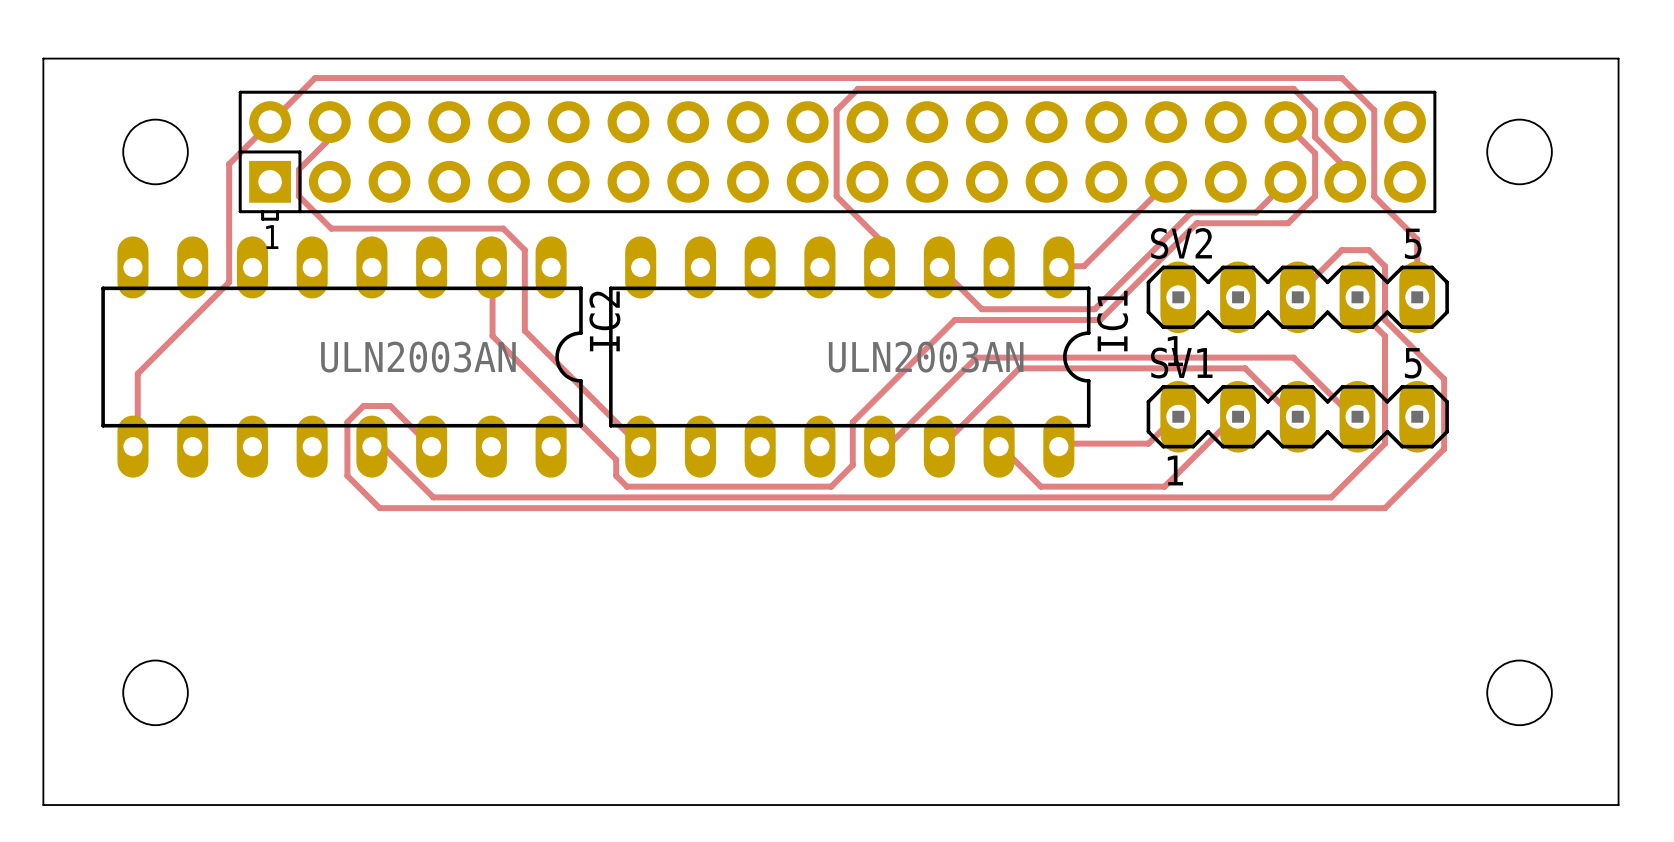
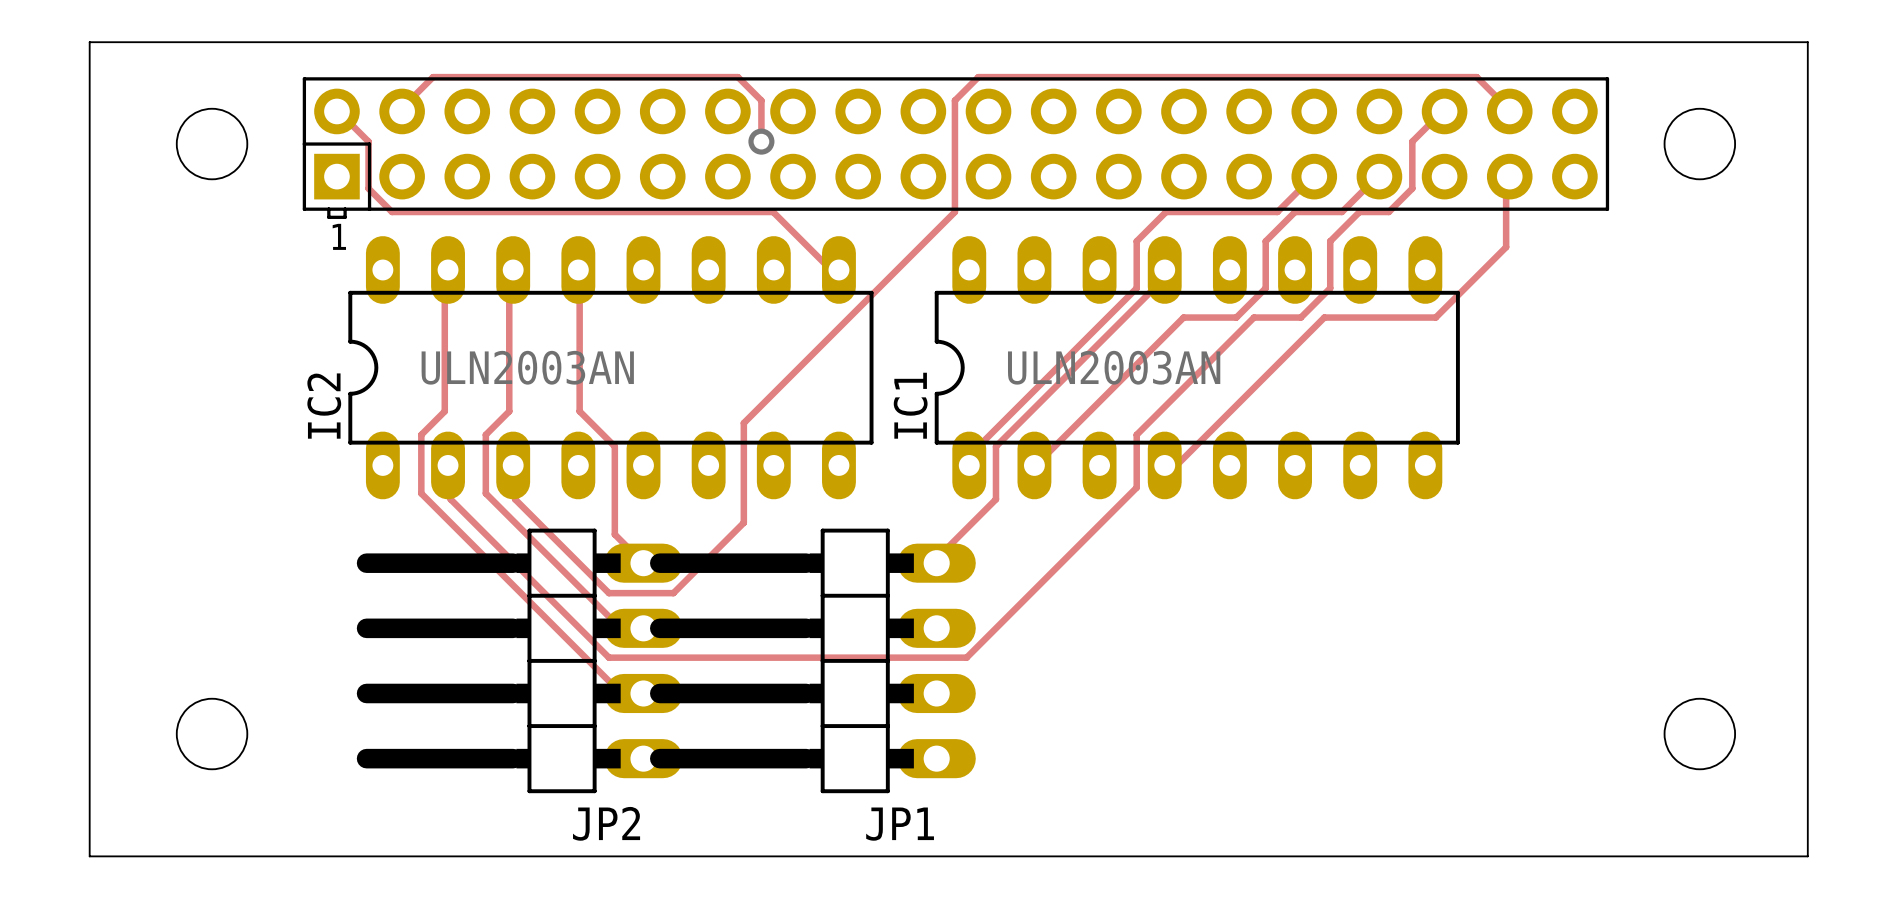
track: (836, 112) (858, 88) (1293, 88) (1315, 110) (1315, 137) (1341, 164) (1341, 180) (1345, 181) -> (954, 100) (978, 77) (1476, 77) (1509, 111)
track: (329, 122) (325, 126) (325, 142) (299, 169) -> (336, 111) (368, 141) (368, 163)
track: none -> (402, 111) (403, 106) (433, 77) (737, 77) (761, 100) (761, 141)
track: (1285, 122) (1315, 153) (1315, 196) (1288, 223) (1196, 223) (1100, 319) (954, 319) (852, 422) (852, 434) -> (1314, 176) (1277, 211) (1166, 211) (1136, 241) (1136, 288) (972, 452)
via: none -> (761, 141)
track: (1166, 181) (1164, 185) (1083, 266) (1058, 267) -> none
track: none -> (1379, 176) (1341, 211) (1295, 211) (1265, 241) (1265, 288) (1236, 317) (1183, 317) (1034, 465)
track: (1285, 181) (1255, 212) (1191, 212) (1094, 309) (981, 309) (939, 267) -> none
track: none -> (1509, 176) (1506, 176) (1506, 247) (1435, 317) (1324, 317) (1177, 464) (1164, 465)
track: (299, 192) (299, 196) (331, 228) (503, 228) (524, 250) (524, 330) (640, 446) -> (368, 188) (392, 211) (773, 211) (825, 264) (837, 264) (838, 269)
track: (836, 196) (879, 239) (879, 267) -> (954, 192) (954, 211) (743, 423) (743, 522) (673, 593) (608, 593) (515, 499) (515, 470) (513, 465)
track: none -> (513, 269) (509, 270) (509, 411) (485, 434) (485, 493) (620, 628) (643, 628)
track: none -> (1164, 269) (1160, 270) (1160, 282) (995, 446) (995, 499) (937, 557) (936, 563)
track: (1297, 297) (1298, 293) (1341, 250) (1368, 250) (1384, 266) (1384, 319) (1444, 379) (1444, 449) (1384, 508) (379, 508) (347, 475) (347, 472) -> (643, 693) (620, 692) (421, 493)
SV2: (1297, 297) -> none
track: (1357, 297) (1358, 309) (1384, 336) (1384, 443) (1331, 497) (433, 497) (385, 449) (374, 449) (371, 446) -> (1444, 111) (1412, 141) (1412, 188) (1388, 211) (1359, 211) (1330, 241) (1330, 288) (1300, 317) (1253, 317) (1136, 434) (1136, 487) (966, 657) (608, 657) (450, 499) (450, 470) (448, 465)
track: (1417, 297) (1417, 239) (1374, 196) (1374, 110) (1341, 78) (315, 78) (229, 164) (229, 282) (137, 373) (137, 443) (132, 446) -> none
track: (492, 336) (616, 459) (616, 475) (626, 486) (831, 486) (852, 465) (852, 445) -> (579, 344) (579, 411) (614, 446) (614, 534) (643, 563)
IC2 rotation: 0° (342, 357) -> 180° (610, 367)
IC1 rotation: 0° (849, 357) -> 180° (1197, 367)
track: (1178, 416) (1175, 416) (1148, 443) (1062, 443) (1058, 446) -> none
track: (1238, 416) (1234, 416) (1164, 486) (1040, 486) (999, 446) -> none
track: (1297, 416) (1293, 416) (1245, 368) (1019, 368) (939, 446) -> none
SV1: (1297, 416) -> none
track: (1357, 416) (1352, 416) (1293, 357) (976, 357) (890, 443) (879, 443) (879, 446) -> none
track: (347, 422) (363, 406) (390, 406) (431, 446) -> (421, 438) (421, 434) (444, 411) (444, 270) (448, 269)
JP2: none -> (519, 660)
JP1: none -> (812, 660)

